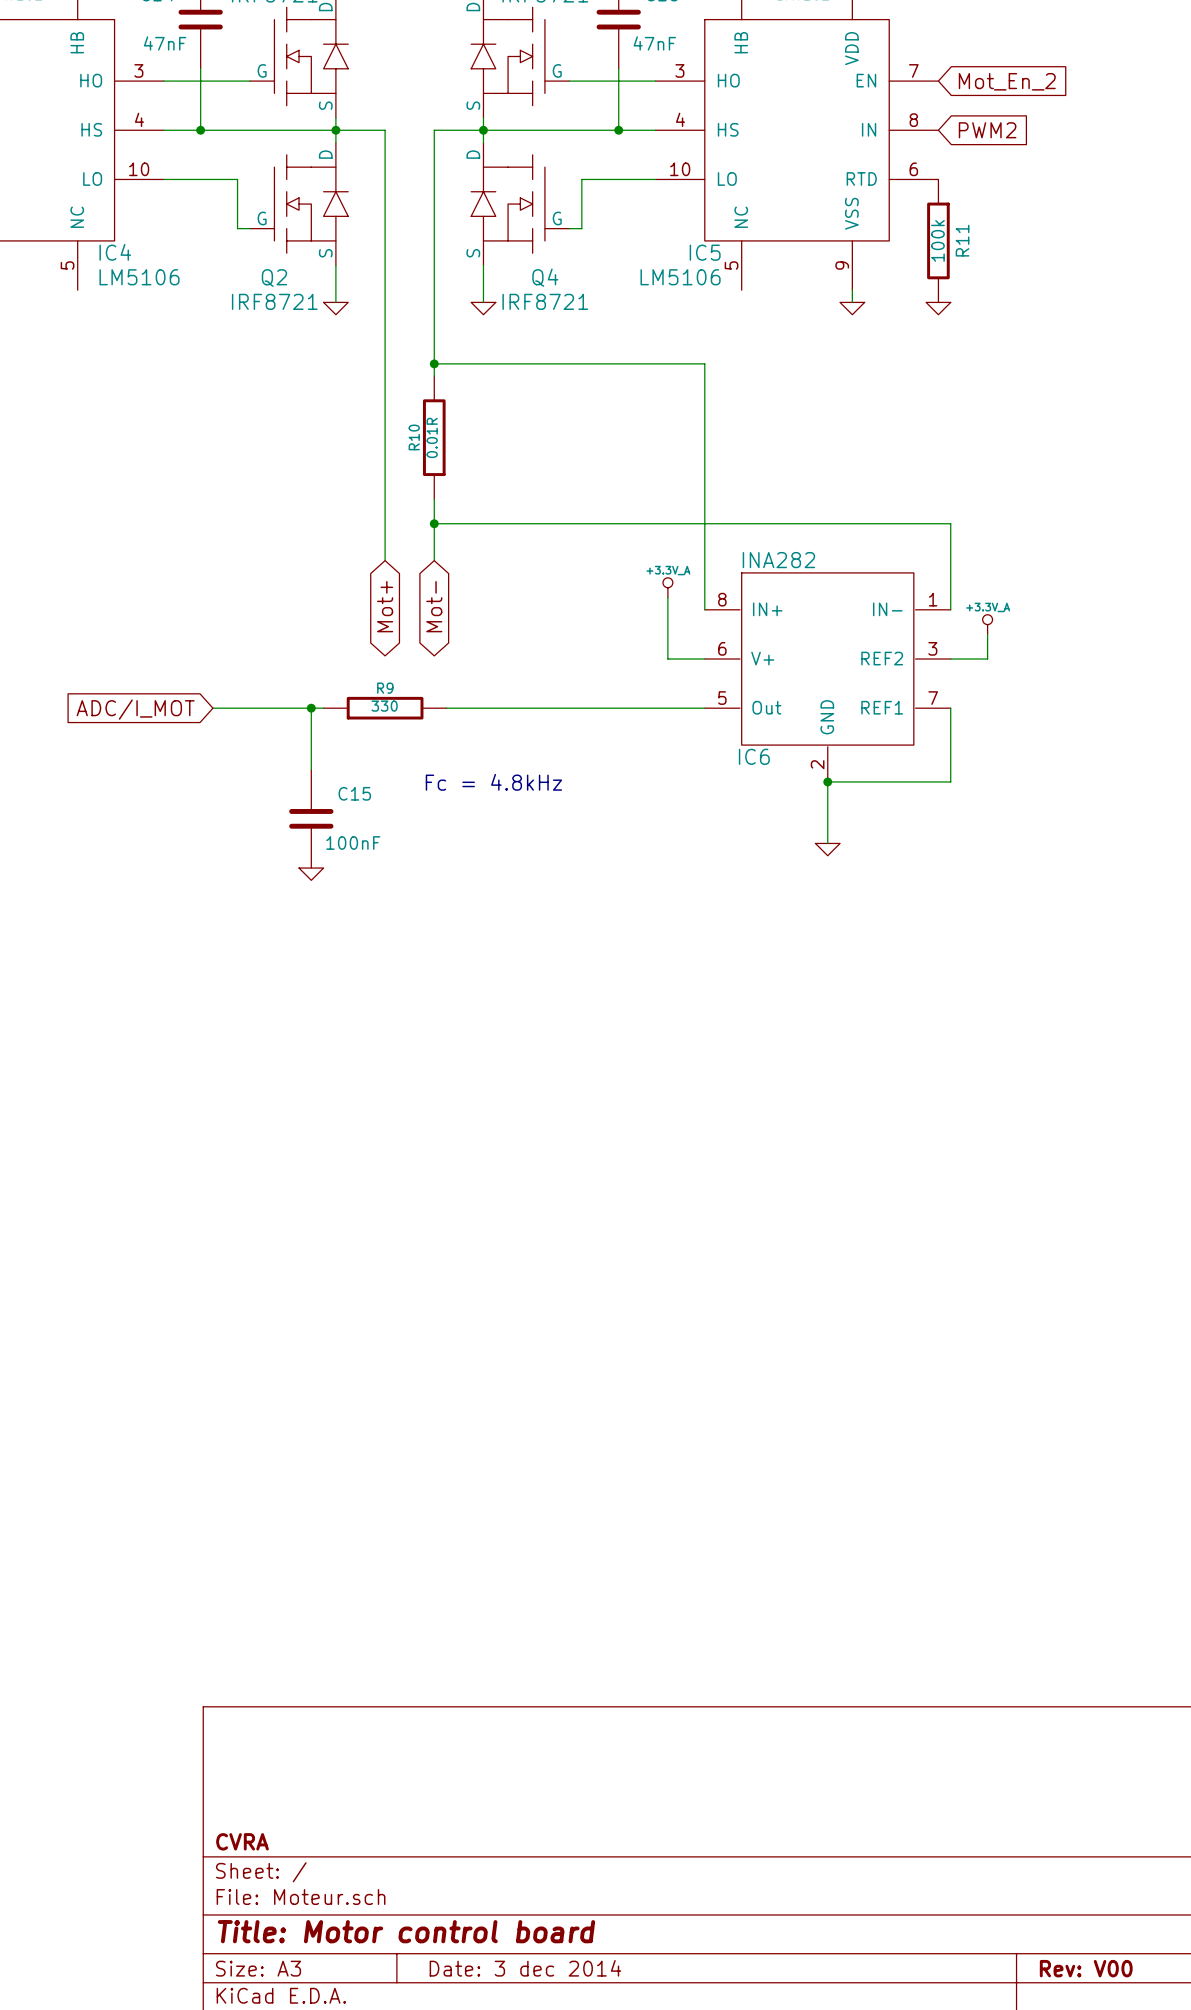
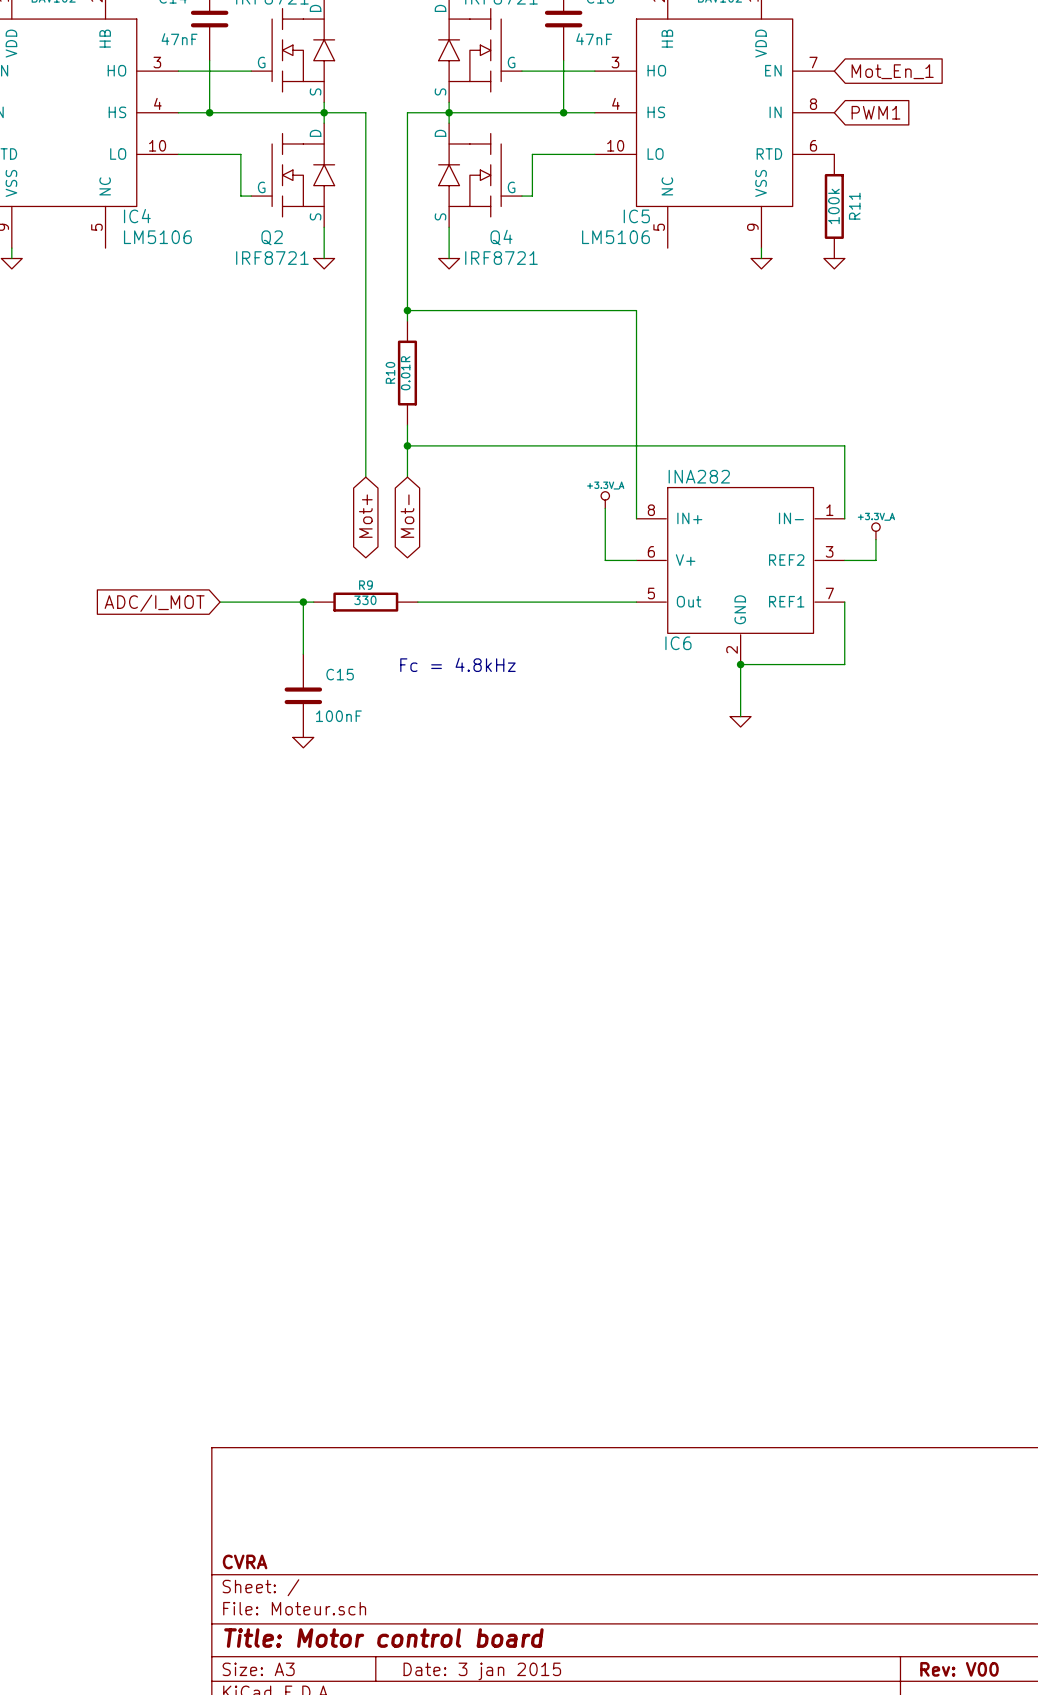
global label: Mot_En_2 (1007, 81) -> Mot_En_1 (892, 71)
global label: PWM2 (987, 130) -> PWM1 (875, 112)
title block: Date: 3 dec 2014 (525, 1968) -> Date: 3 jan 2015 (482, 1671)

